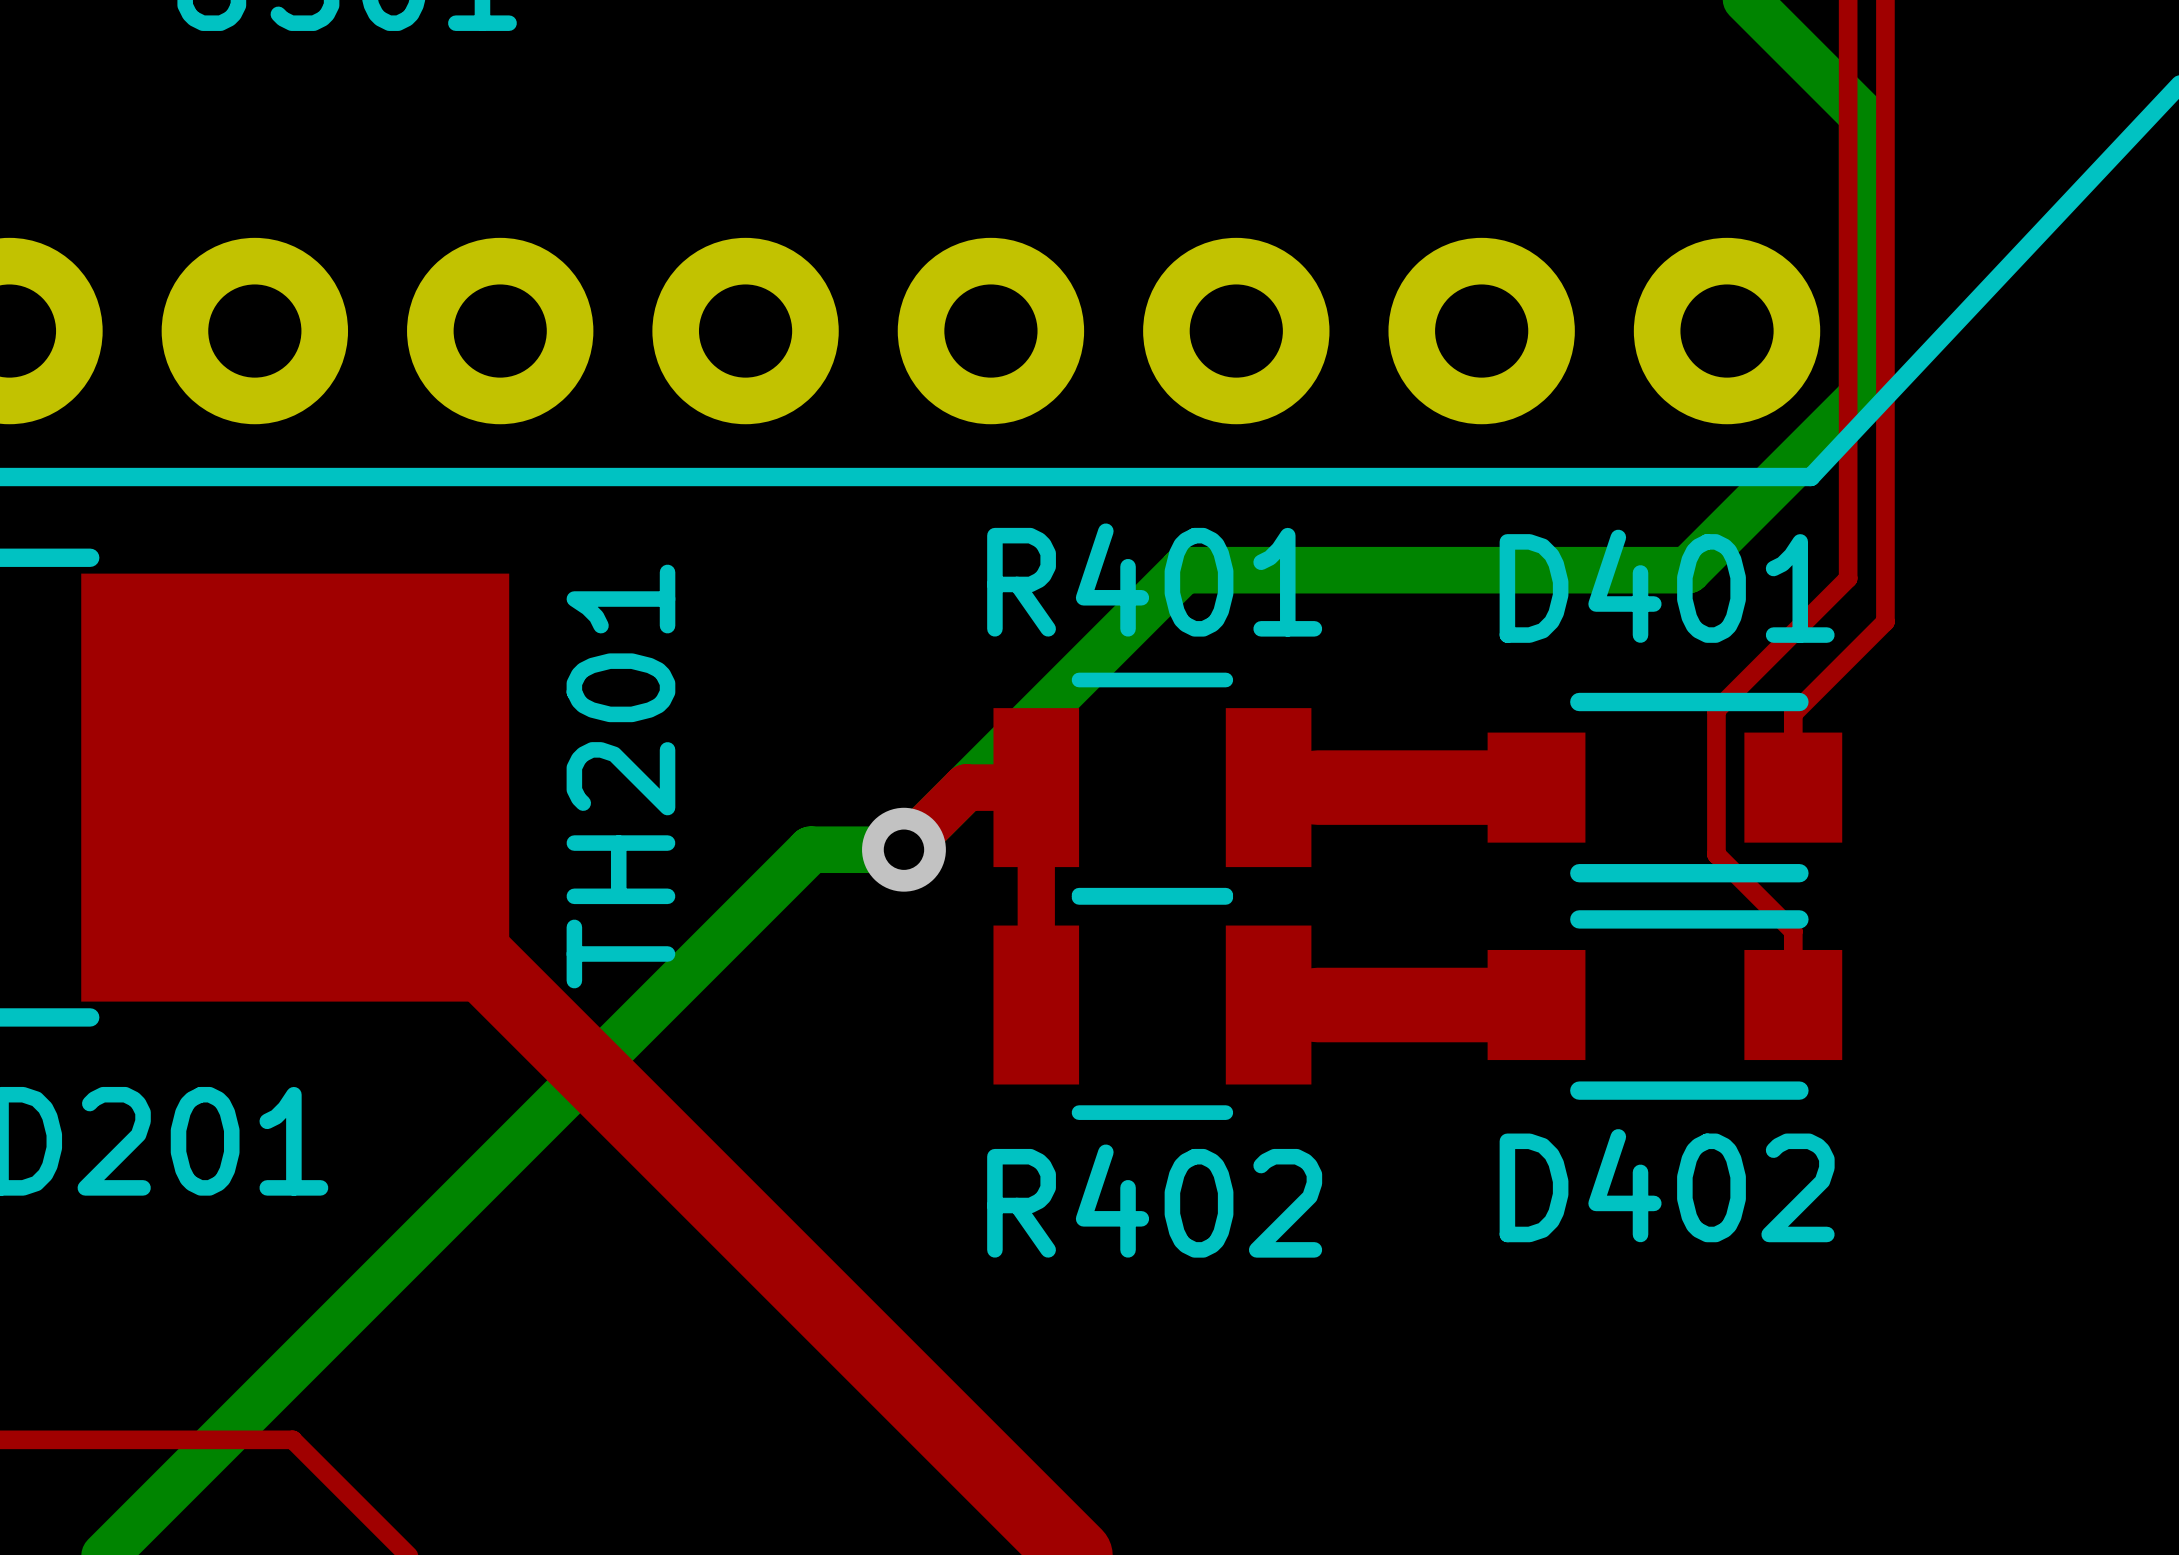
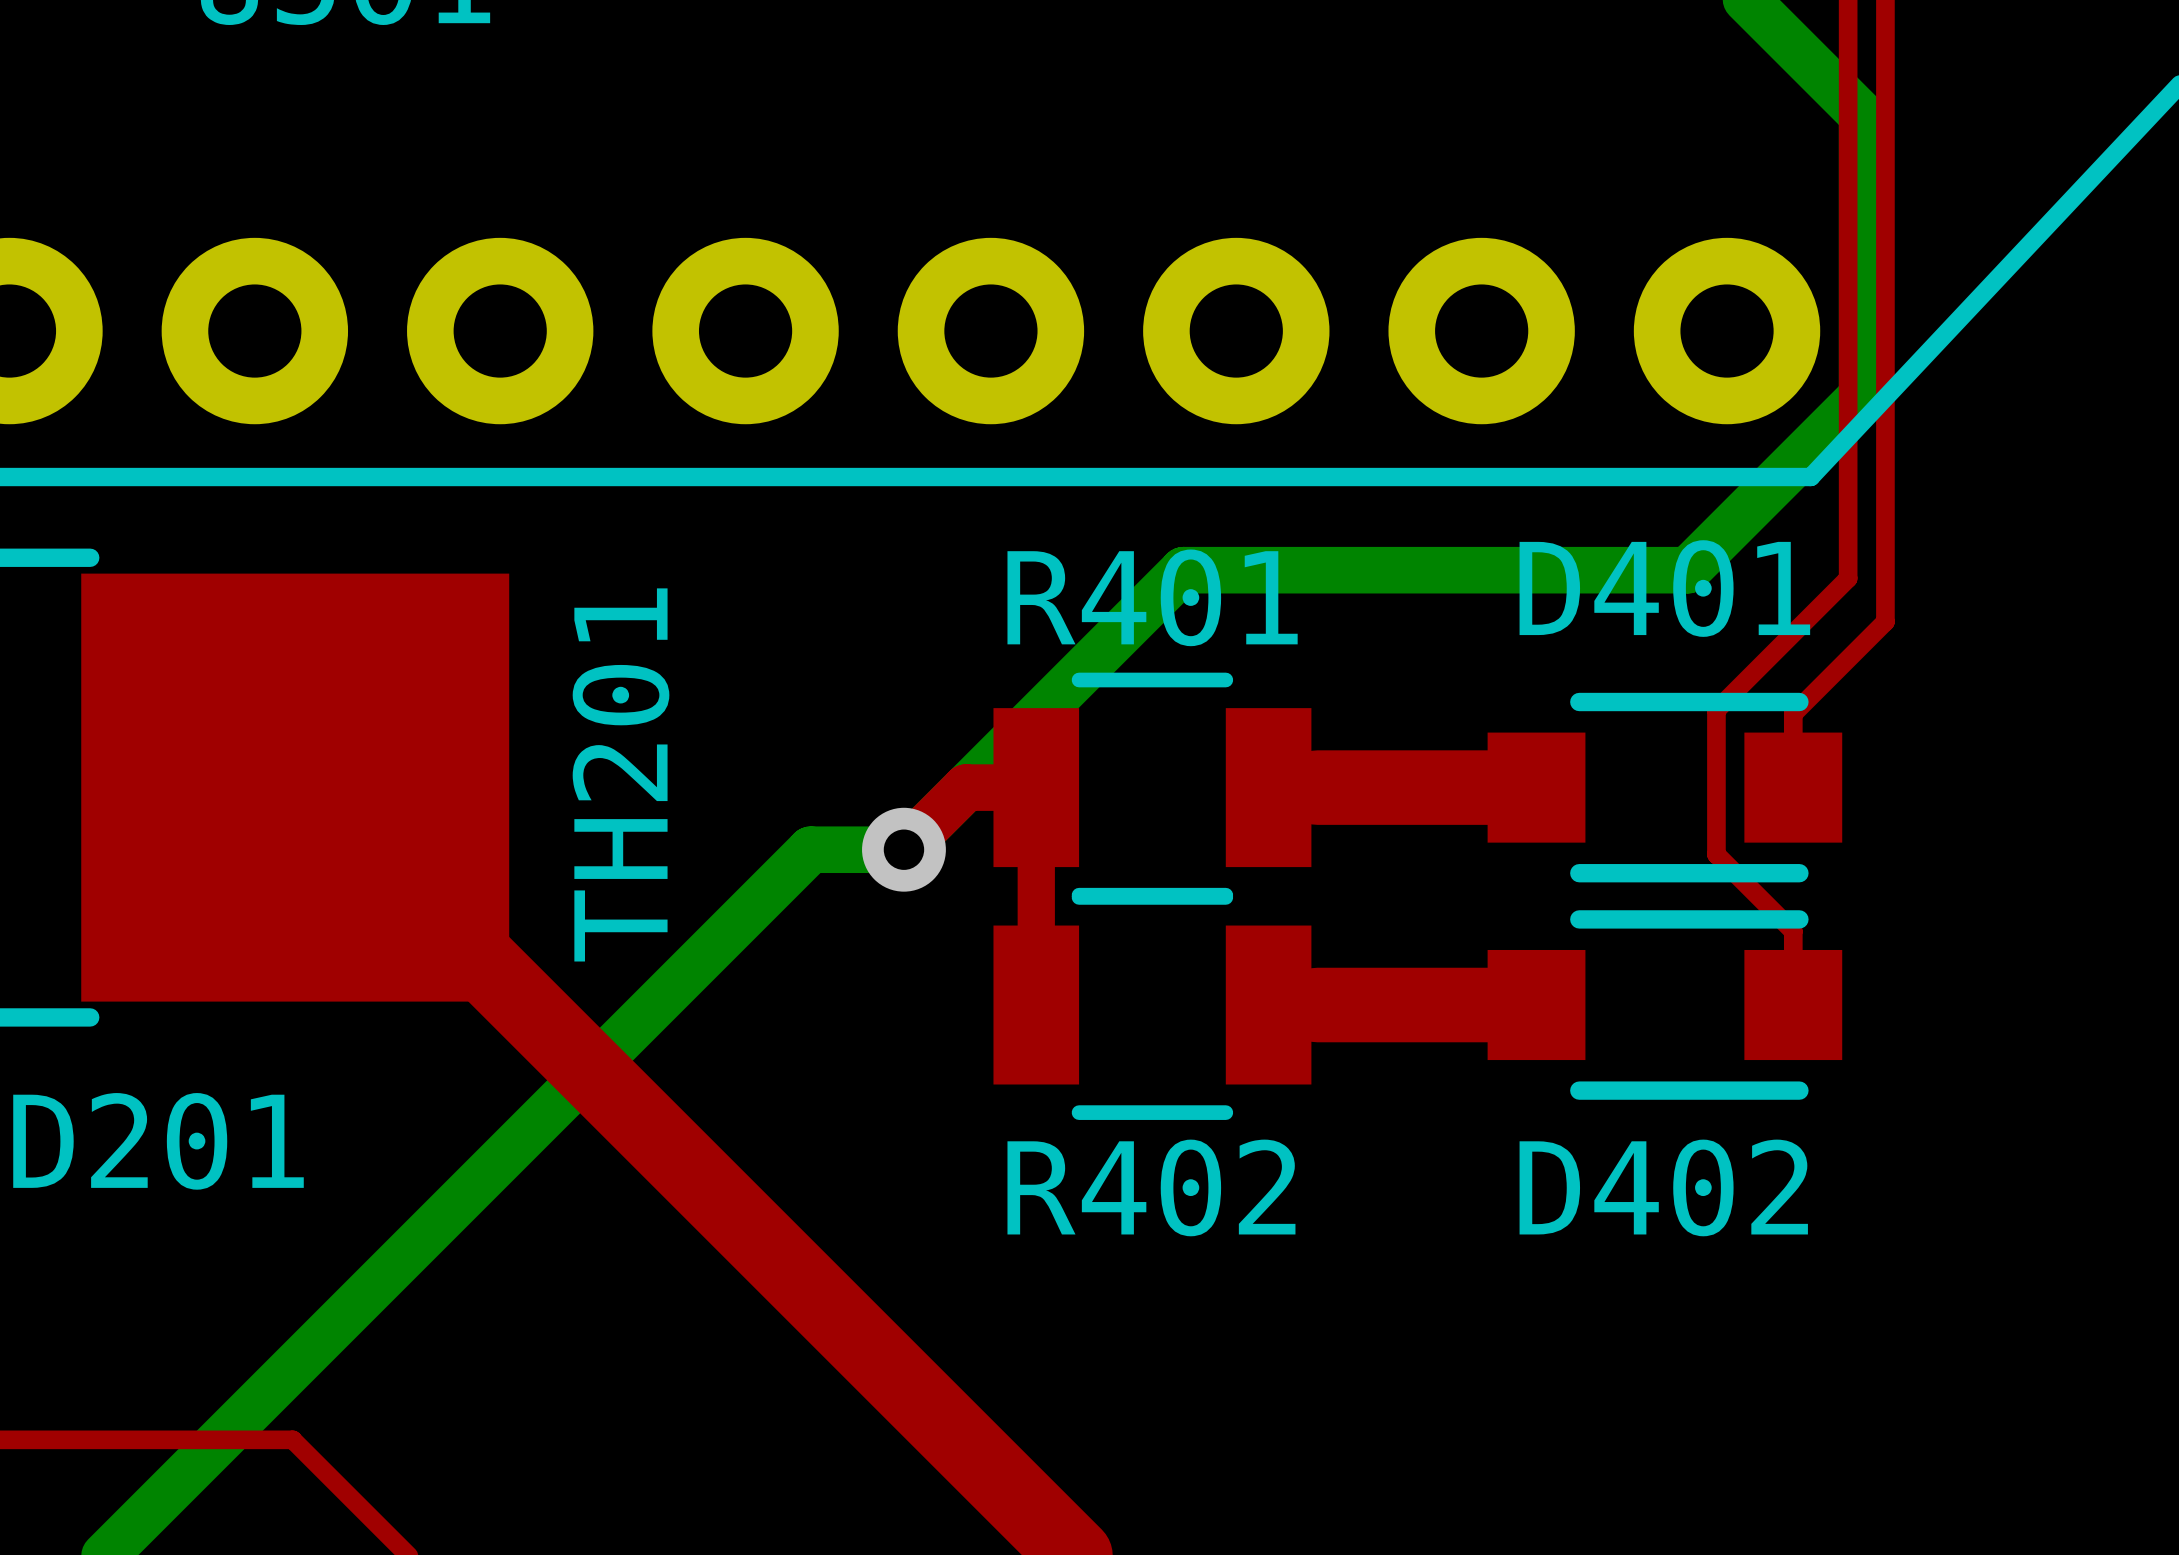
R401 name position: R401 (1154, 580) -> R401 (1152, 597)
R402 name position: R402 (1154, 1201) -> R402 (1151, 1187)

